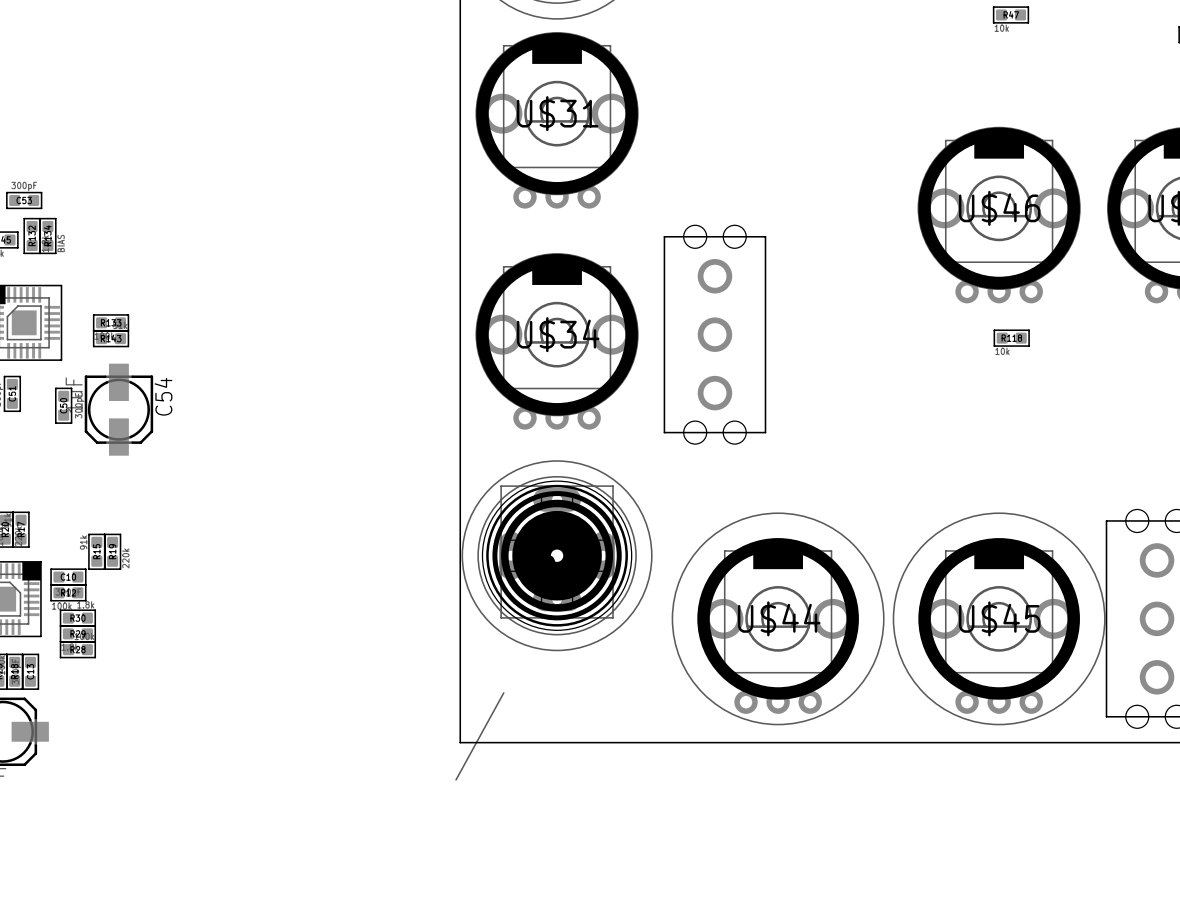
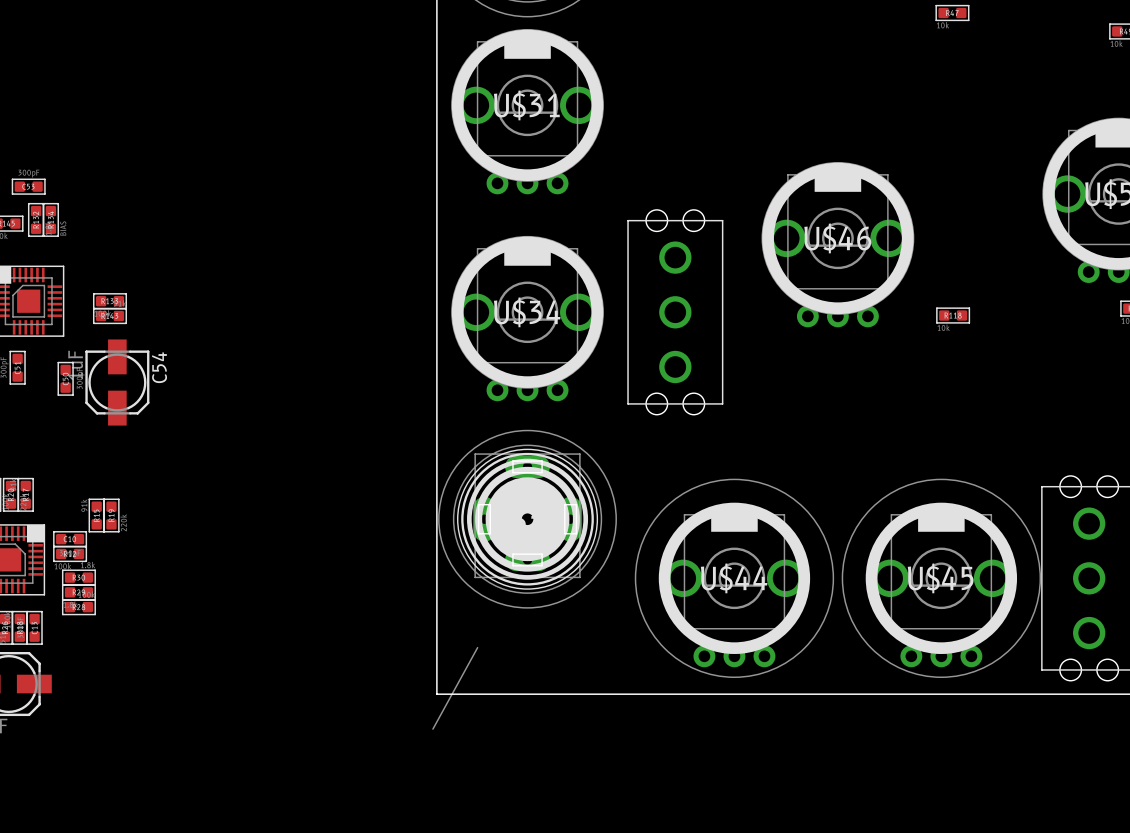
U$46 position: (999, 215) -> (837, 244)

